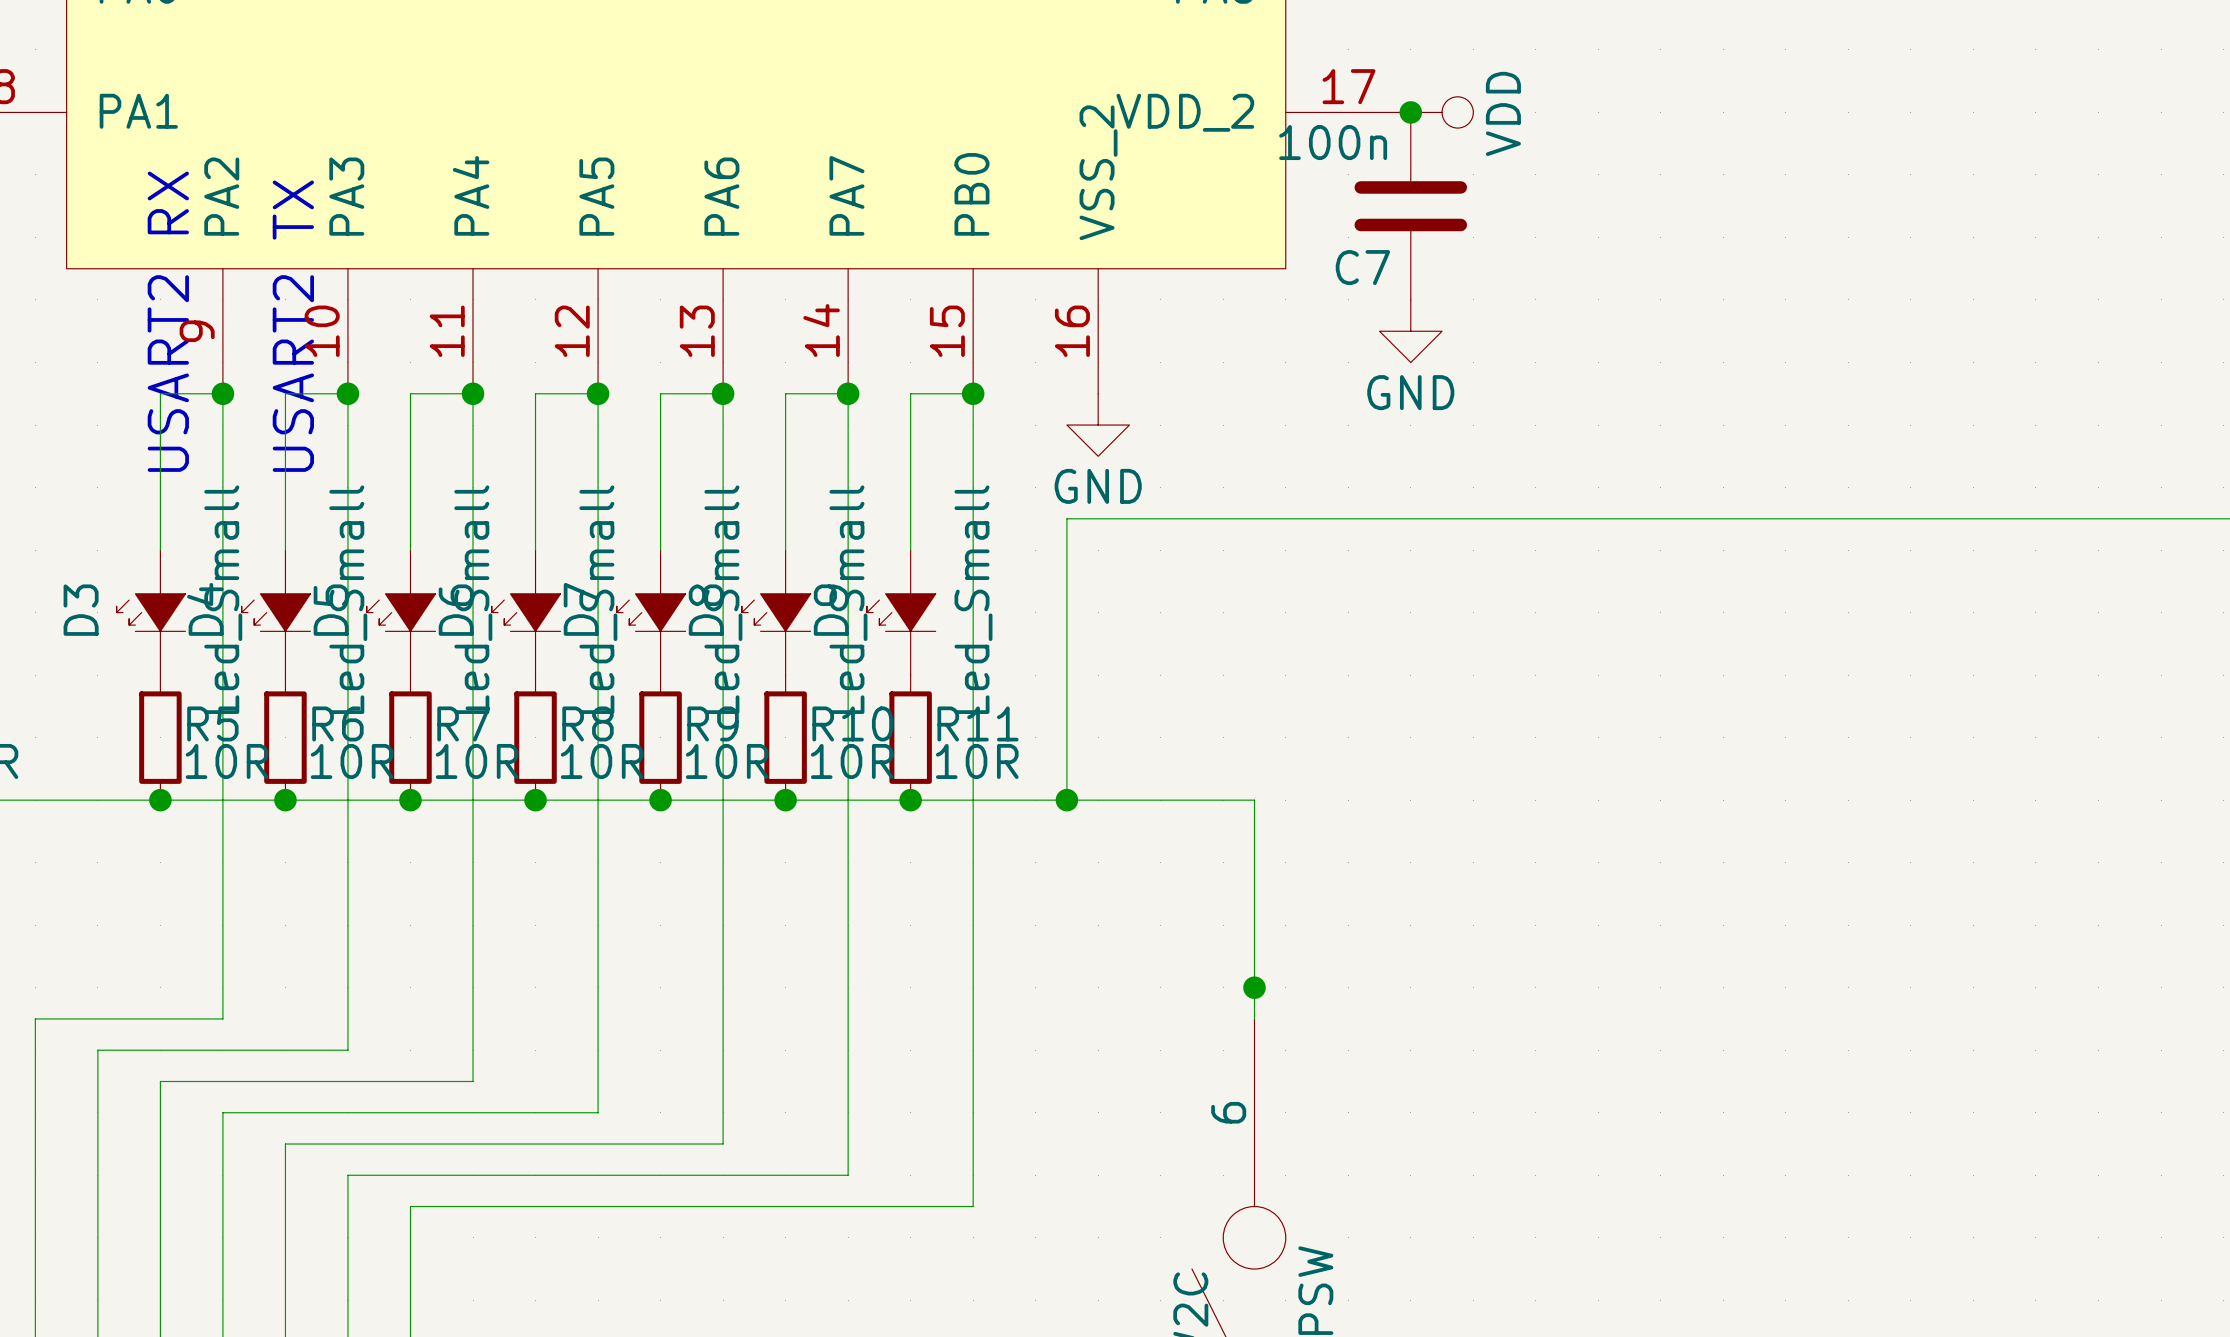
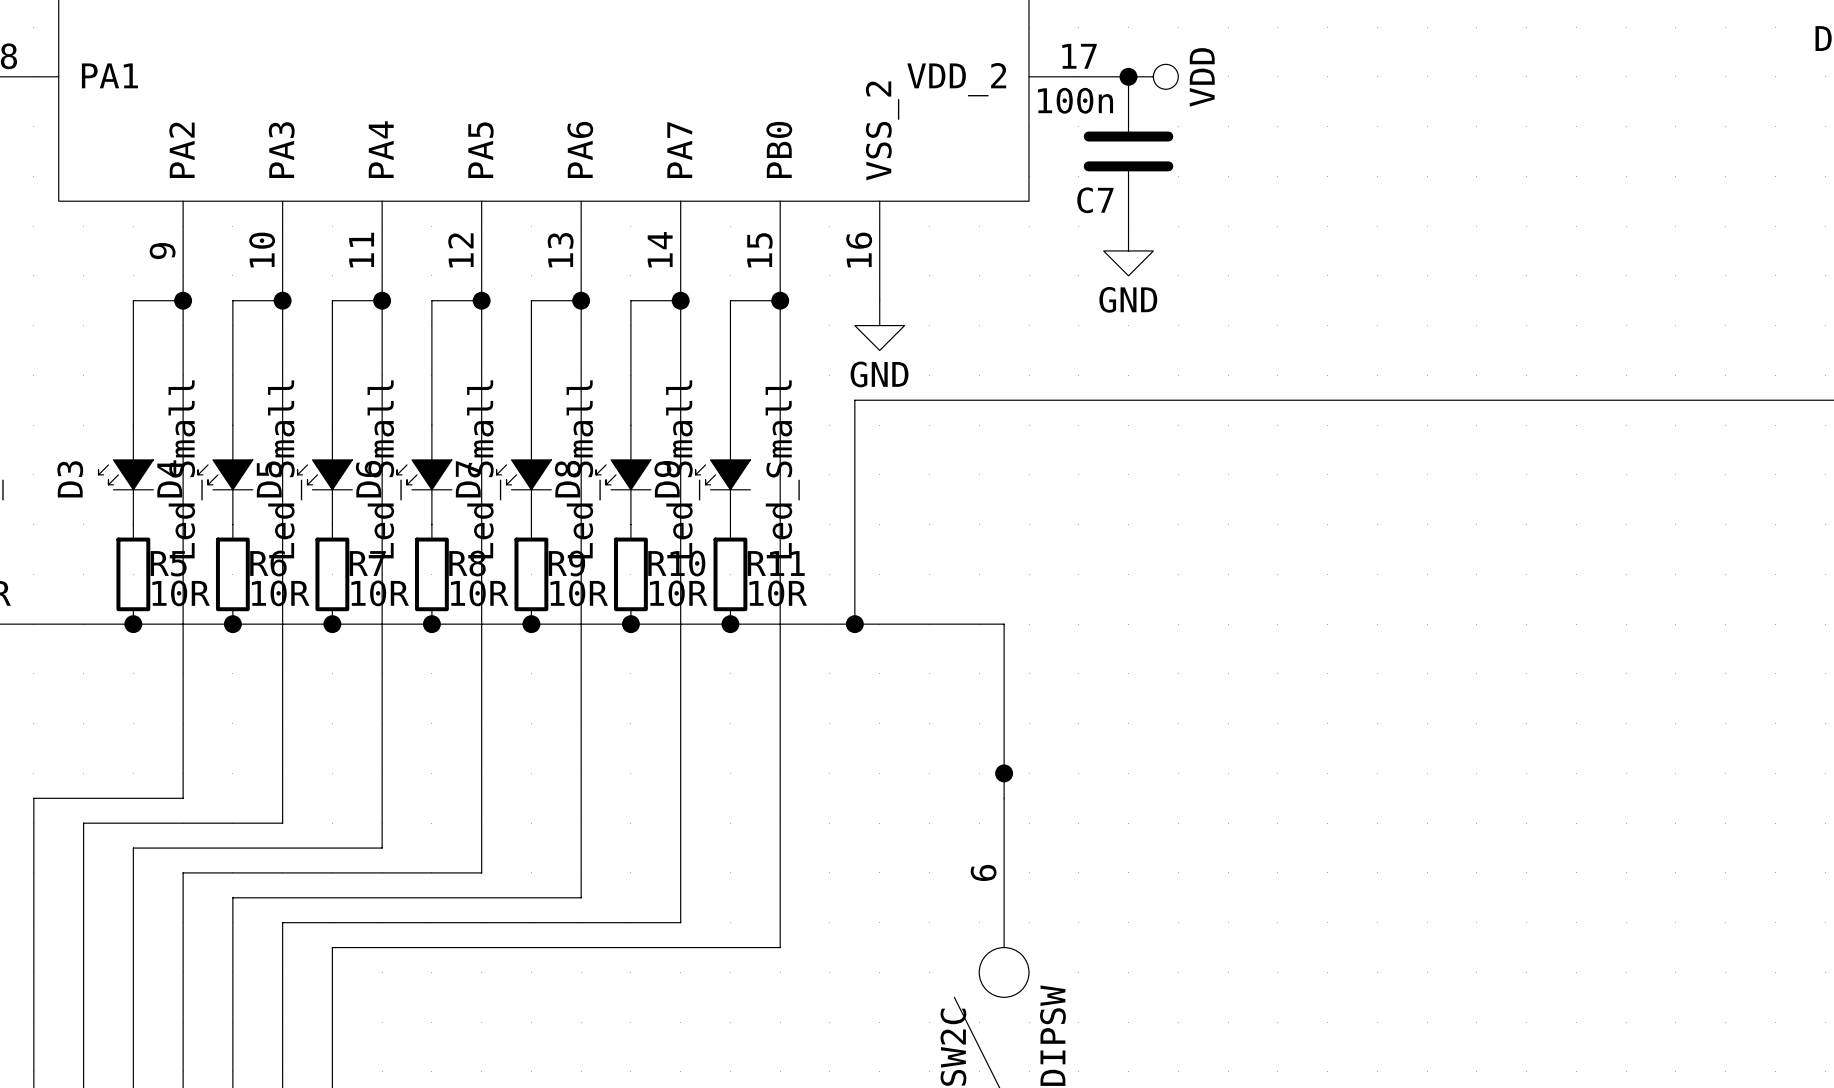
text: USART2 RX (168, 321) -> none
text: USART2 TX (293, 326) -> none

